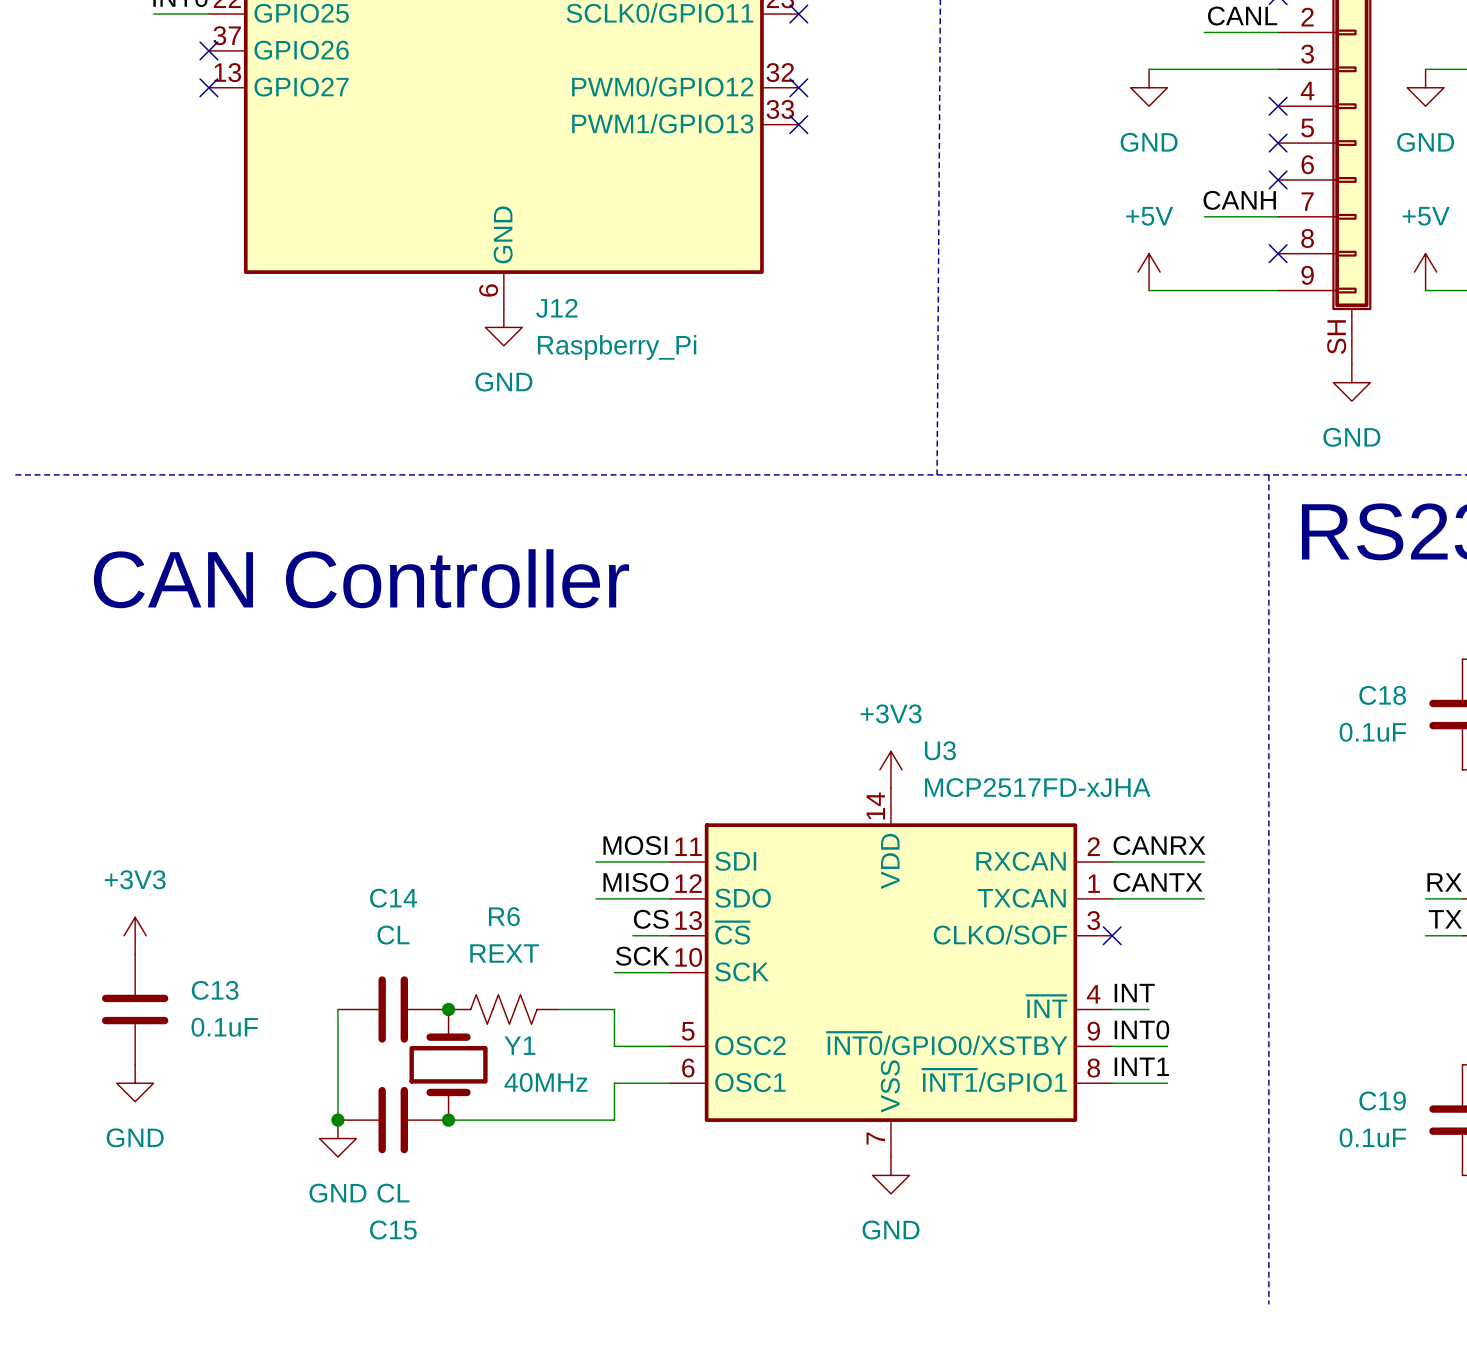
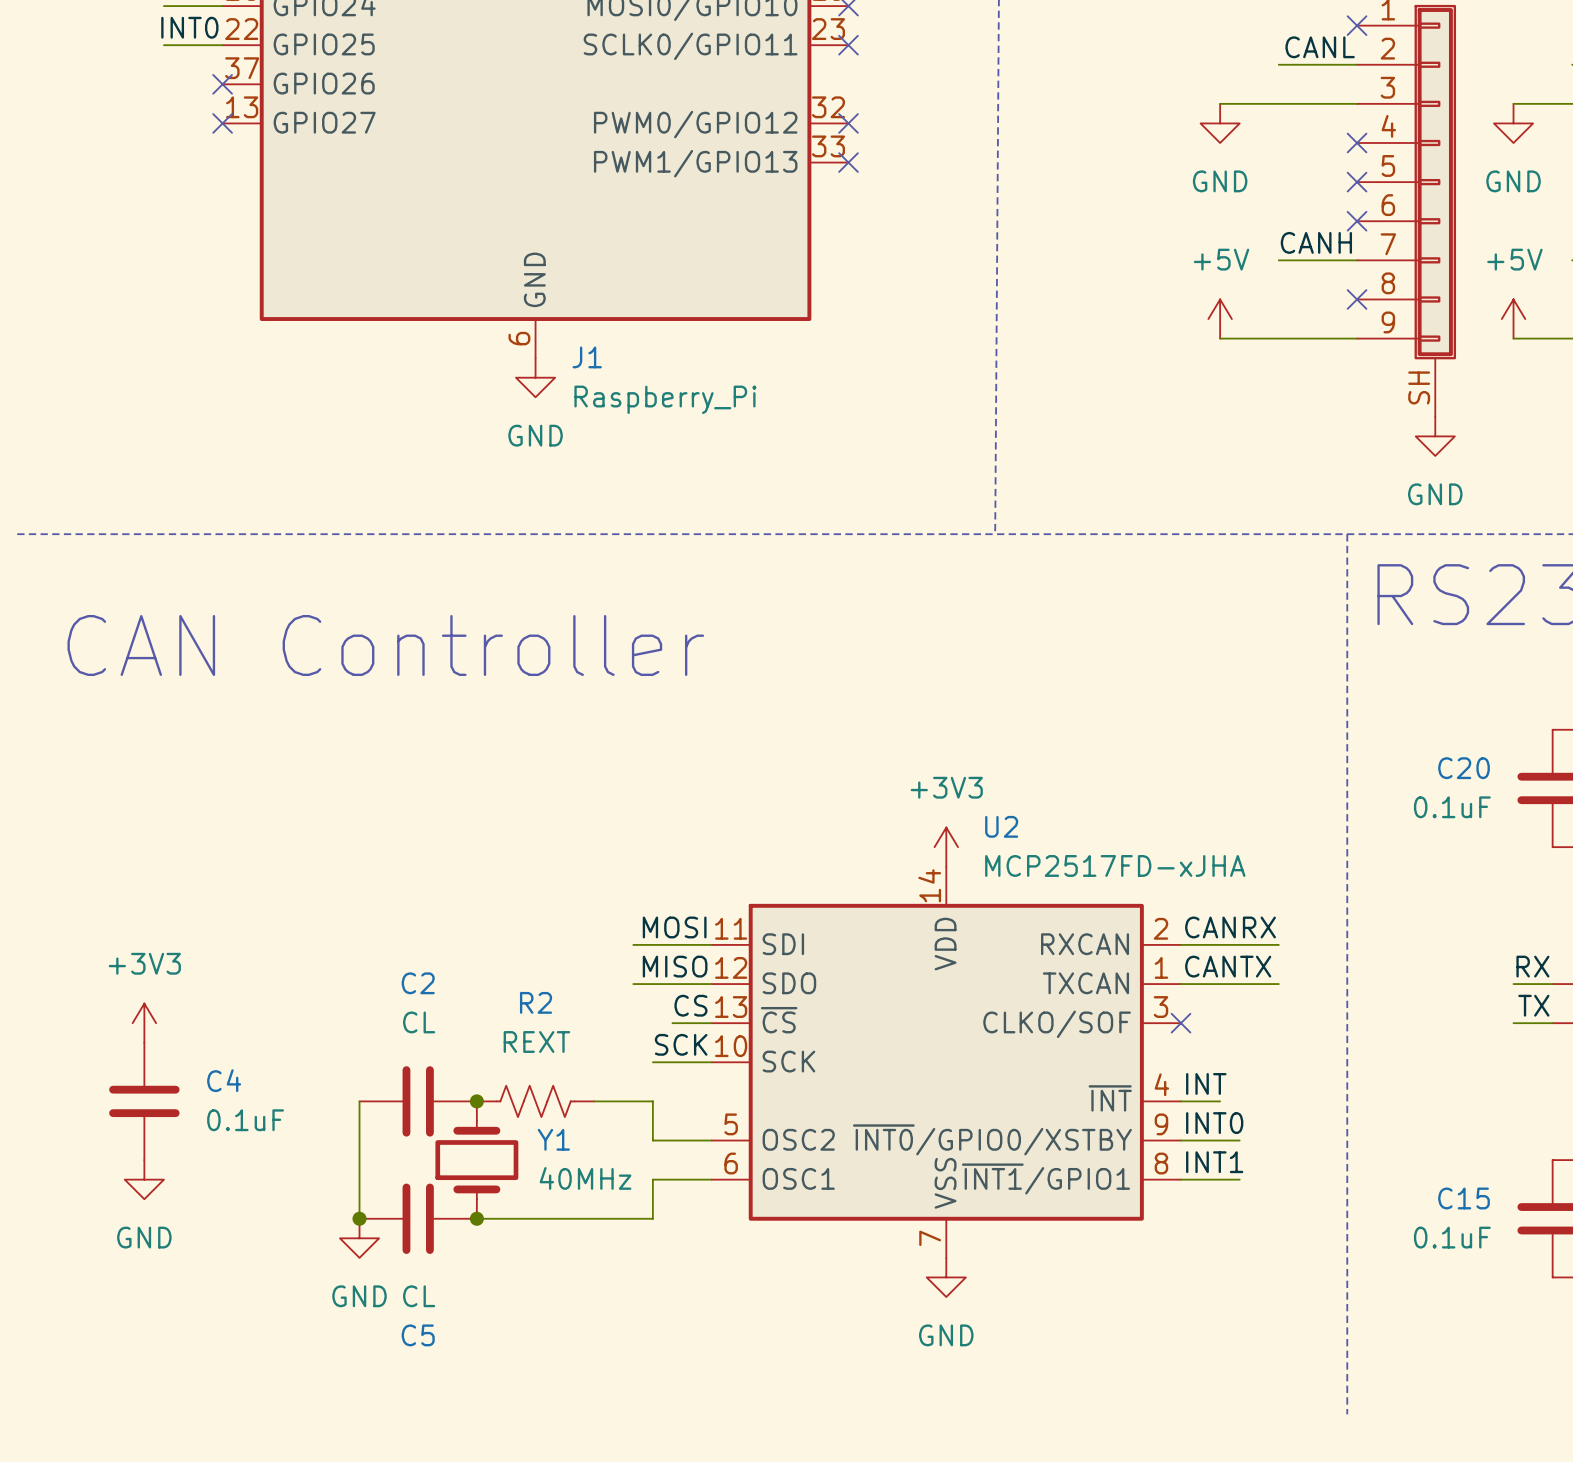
J12 name: J12 (556, 308) -> J1 (587, 357)
C18 name: C18 (1382, 695) -> C20 (1464, 768)
U3 name: U3 (940, 750) -> U2 (1001, 826)
C14 name: C14 (393, 898) -> C2 (418, 983)
R6 name: R6 (504, 916) -> R2 (536, 1002)
C13 name: C13 (215, 990) -> C4 (224, 1080)
C19 name: C19 (1382, 1100) -> C15 (1464, 1198)
C15 name: C15 (393, 1230) -> C5 (418, 1335)

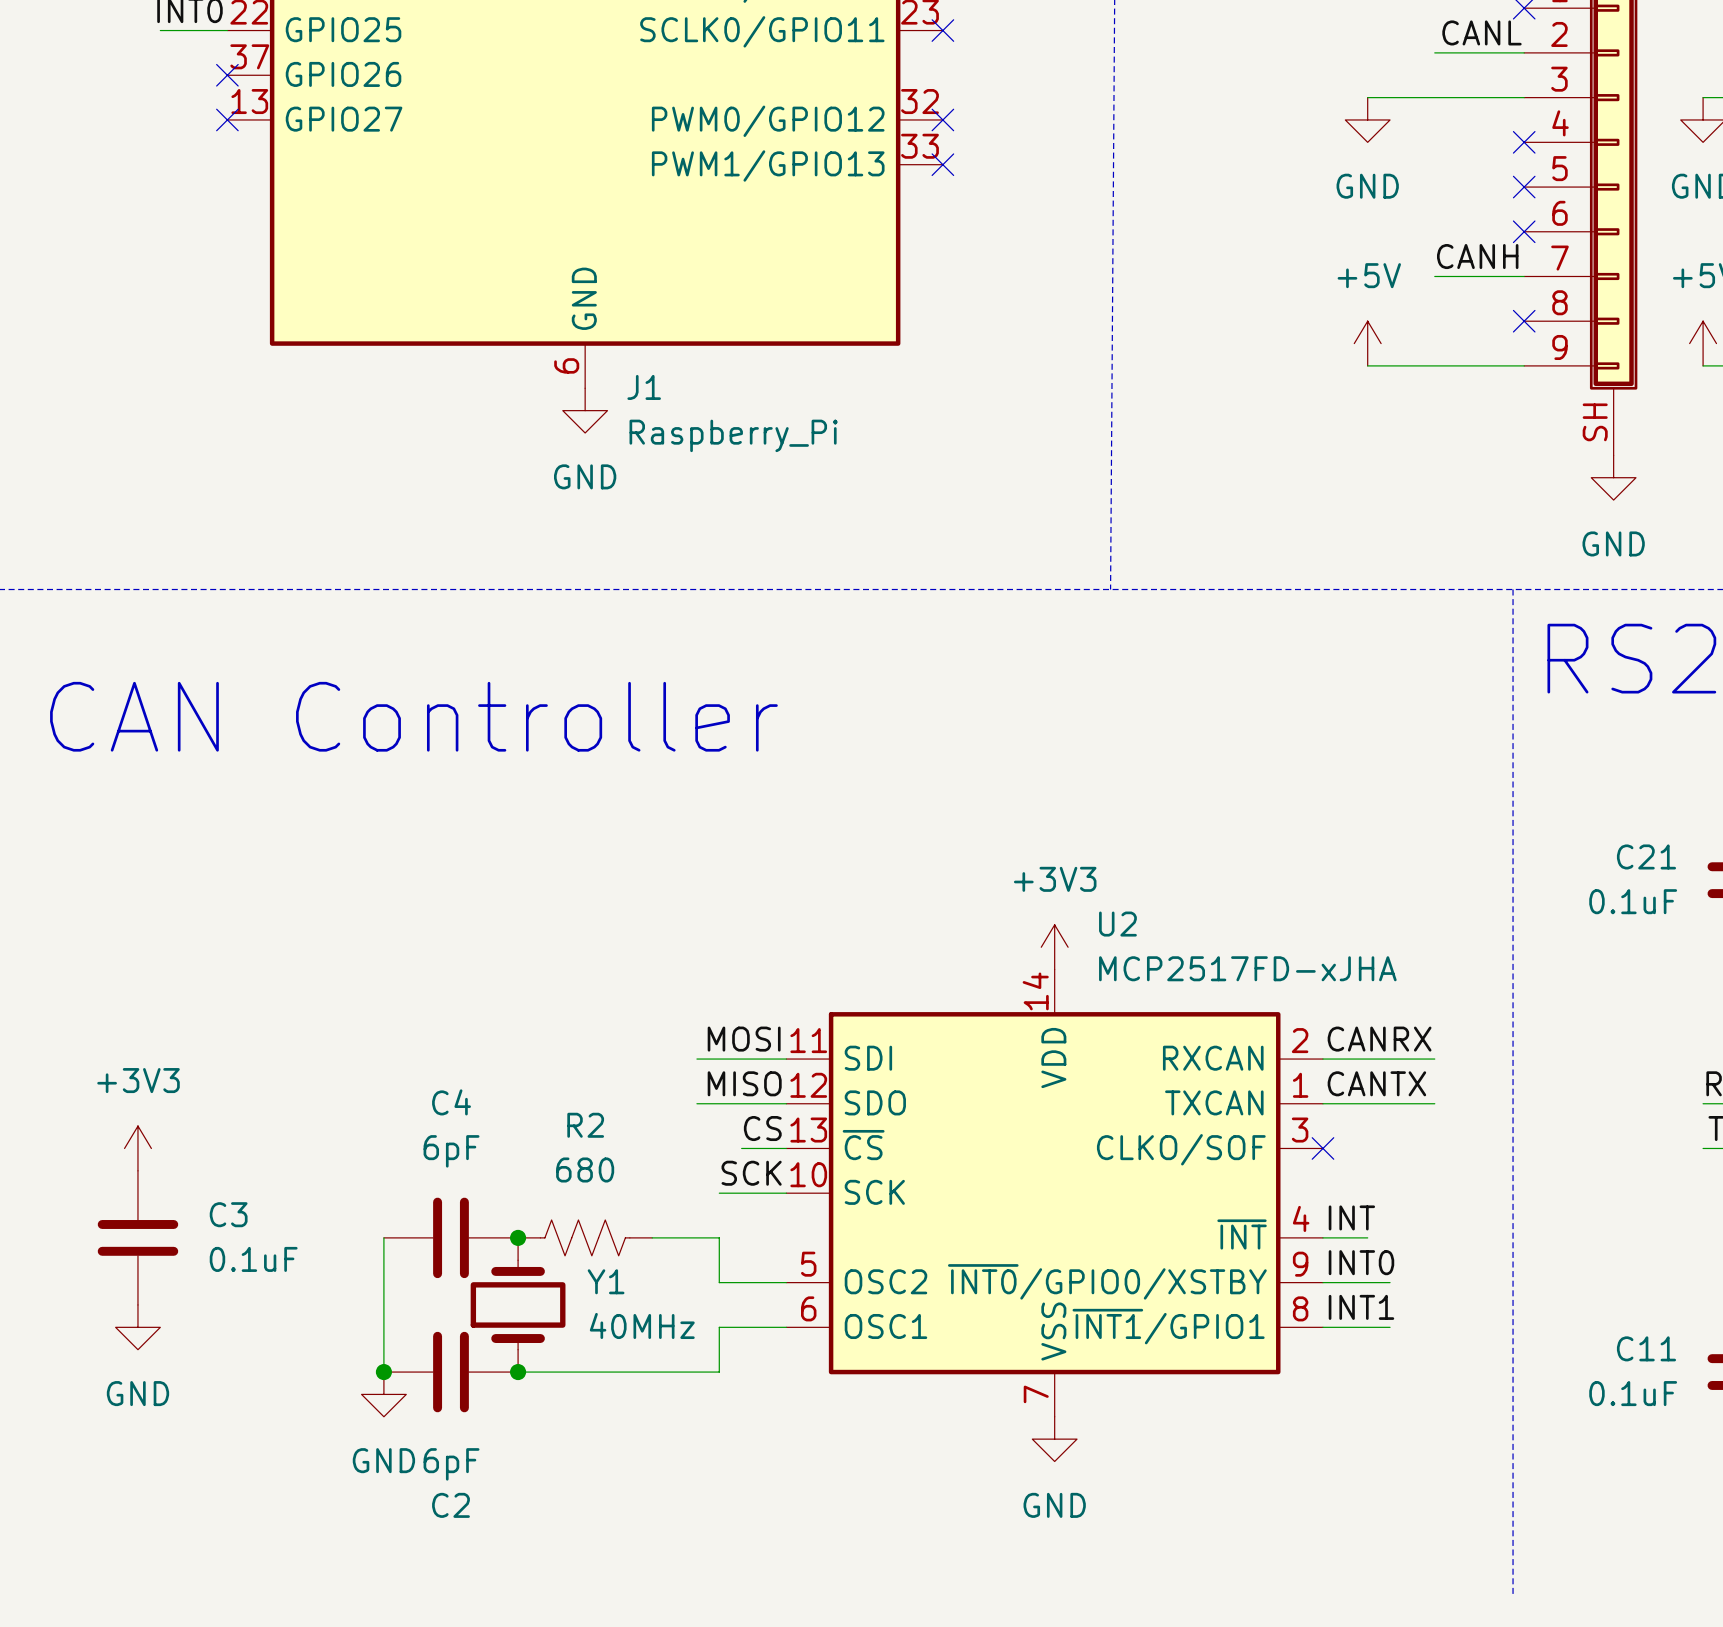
C20 name: C20 (1464, 768) -> C21 (1646, 856)
C2 name: C2 (418, 983) -> C4 (451, 1102)
C2 value: CL (419, 1022) -> 6pF (451, 1151)
R2 value: REXT (536, 1042) -> 680 (585, 1169)
C4 name: C4 (224, 1080) -> C3 (228, 1214)
C15 name: C15 (1464, 1198) -> C11 (1646, 1348)
C5 value: CL (419, 1296) -> 6pF (451, 1464)
C5 name: C5 (418, 1335) -> C2 (451, 1505)

